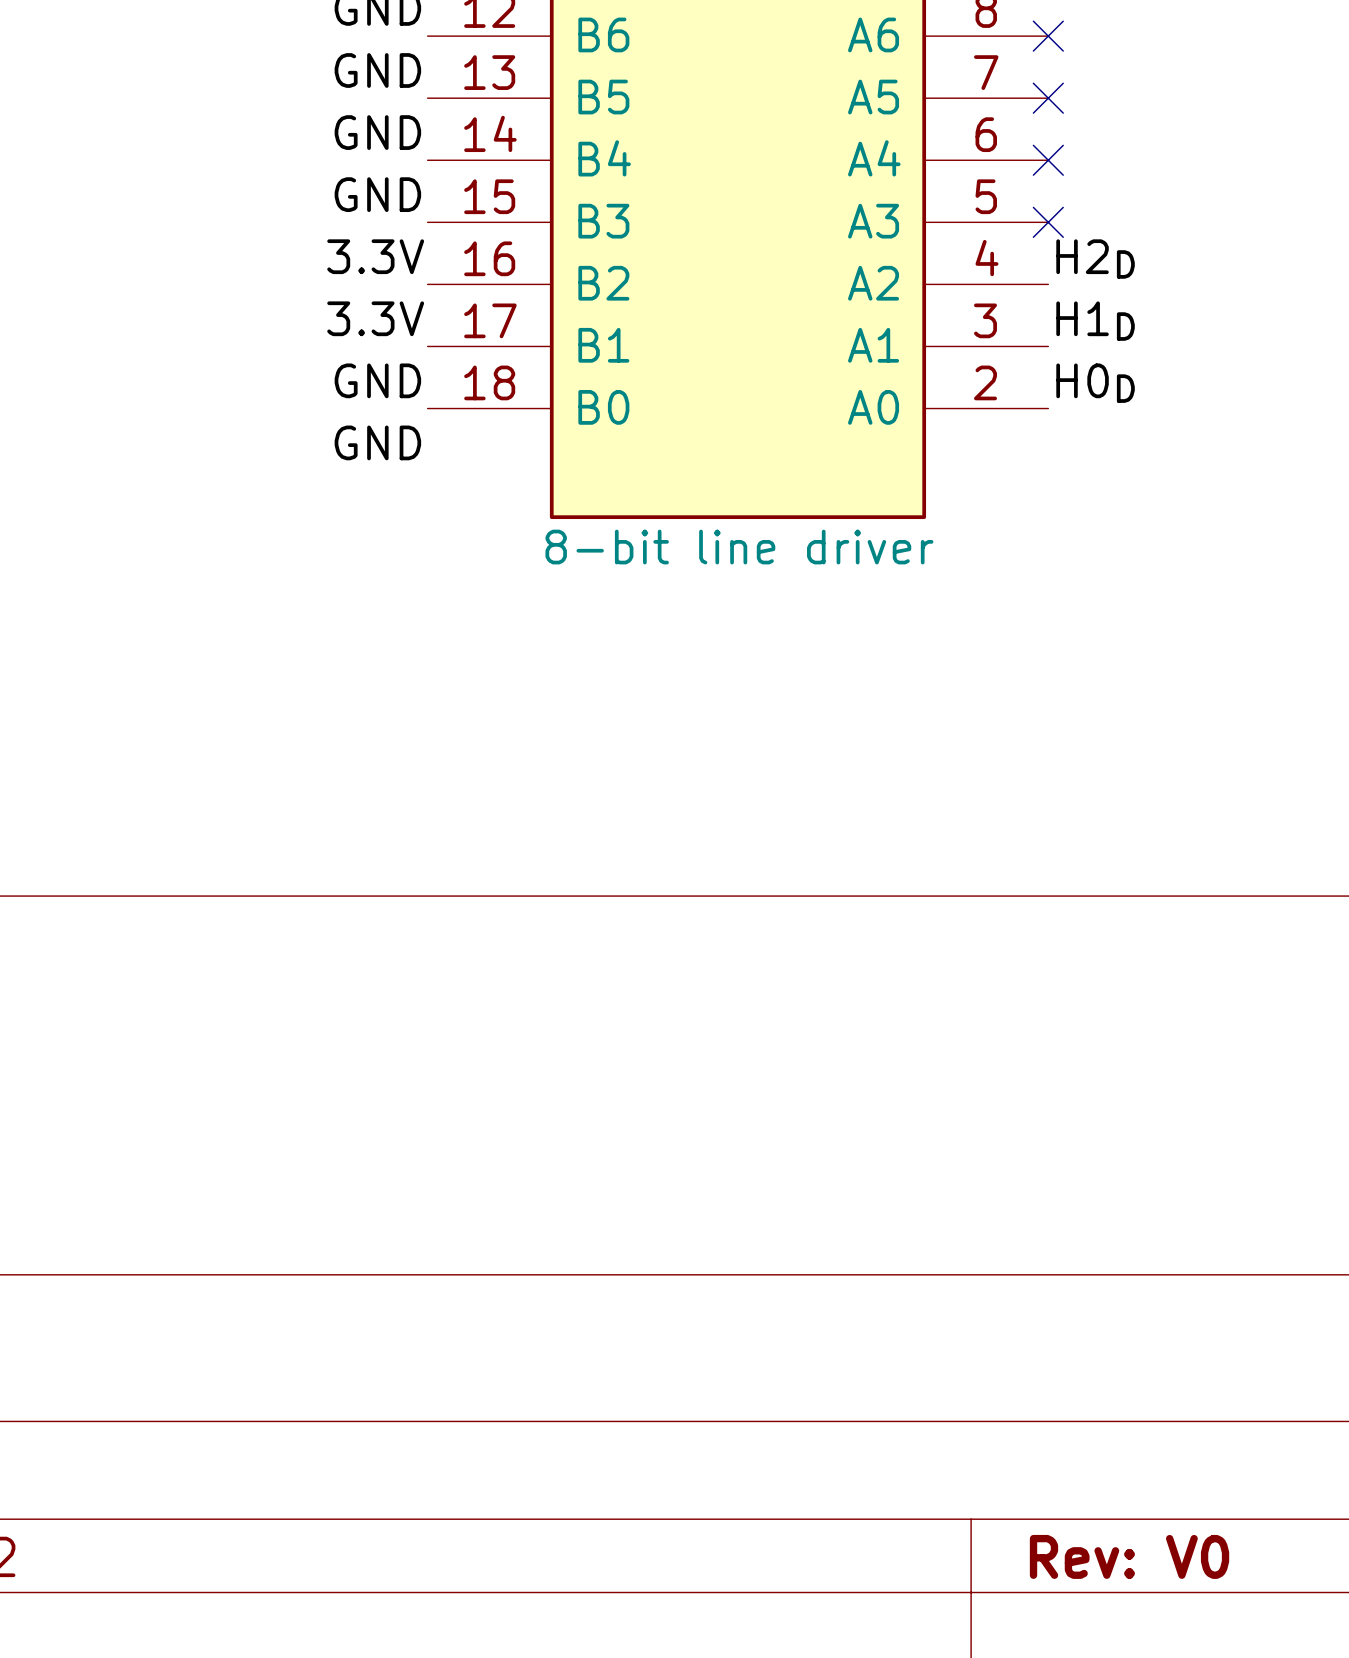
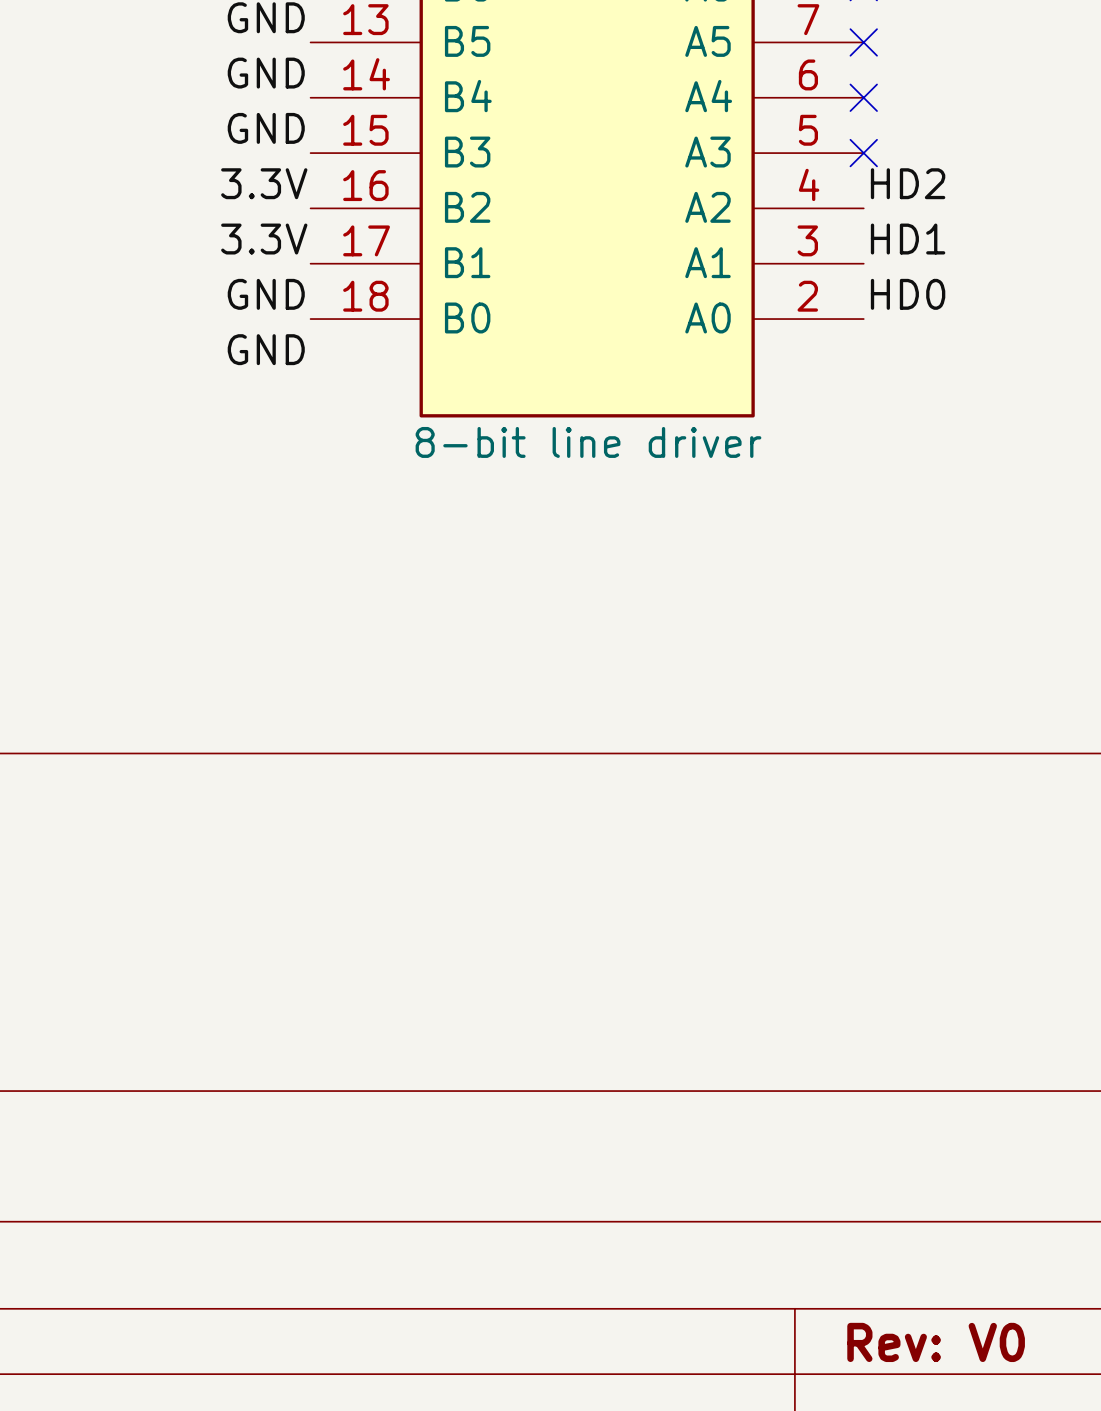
label: H2D (1095, 259) -> HD2 (908, 183)
label: H1D (1095, 321) -> HD1 (908, 239)
label: H0D (1095, 383) -> HD0 (908, 294)

